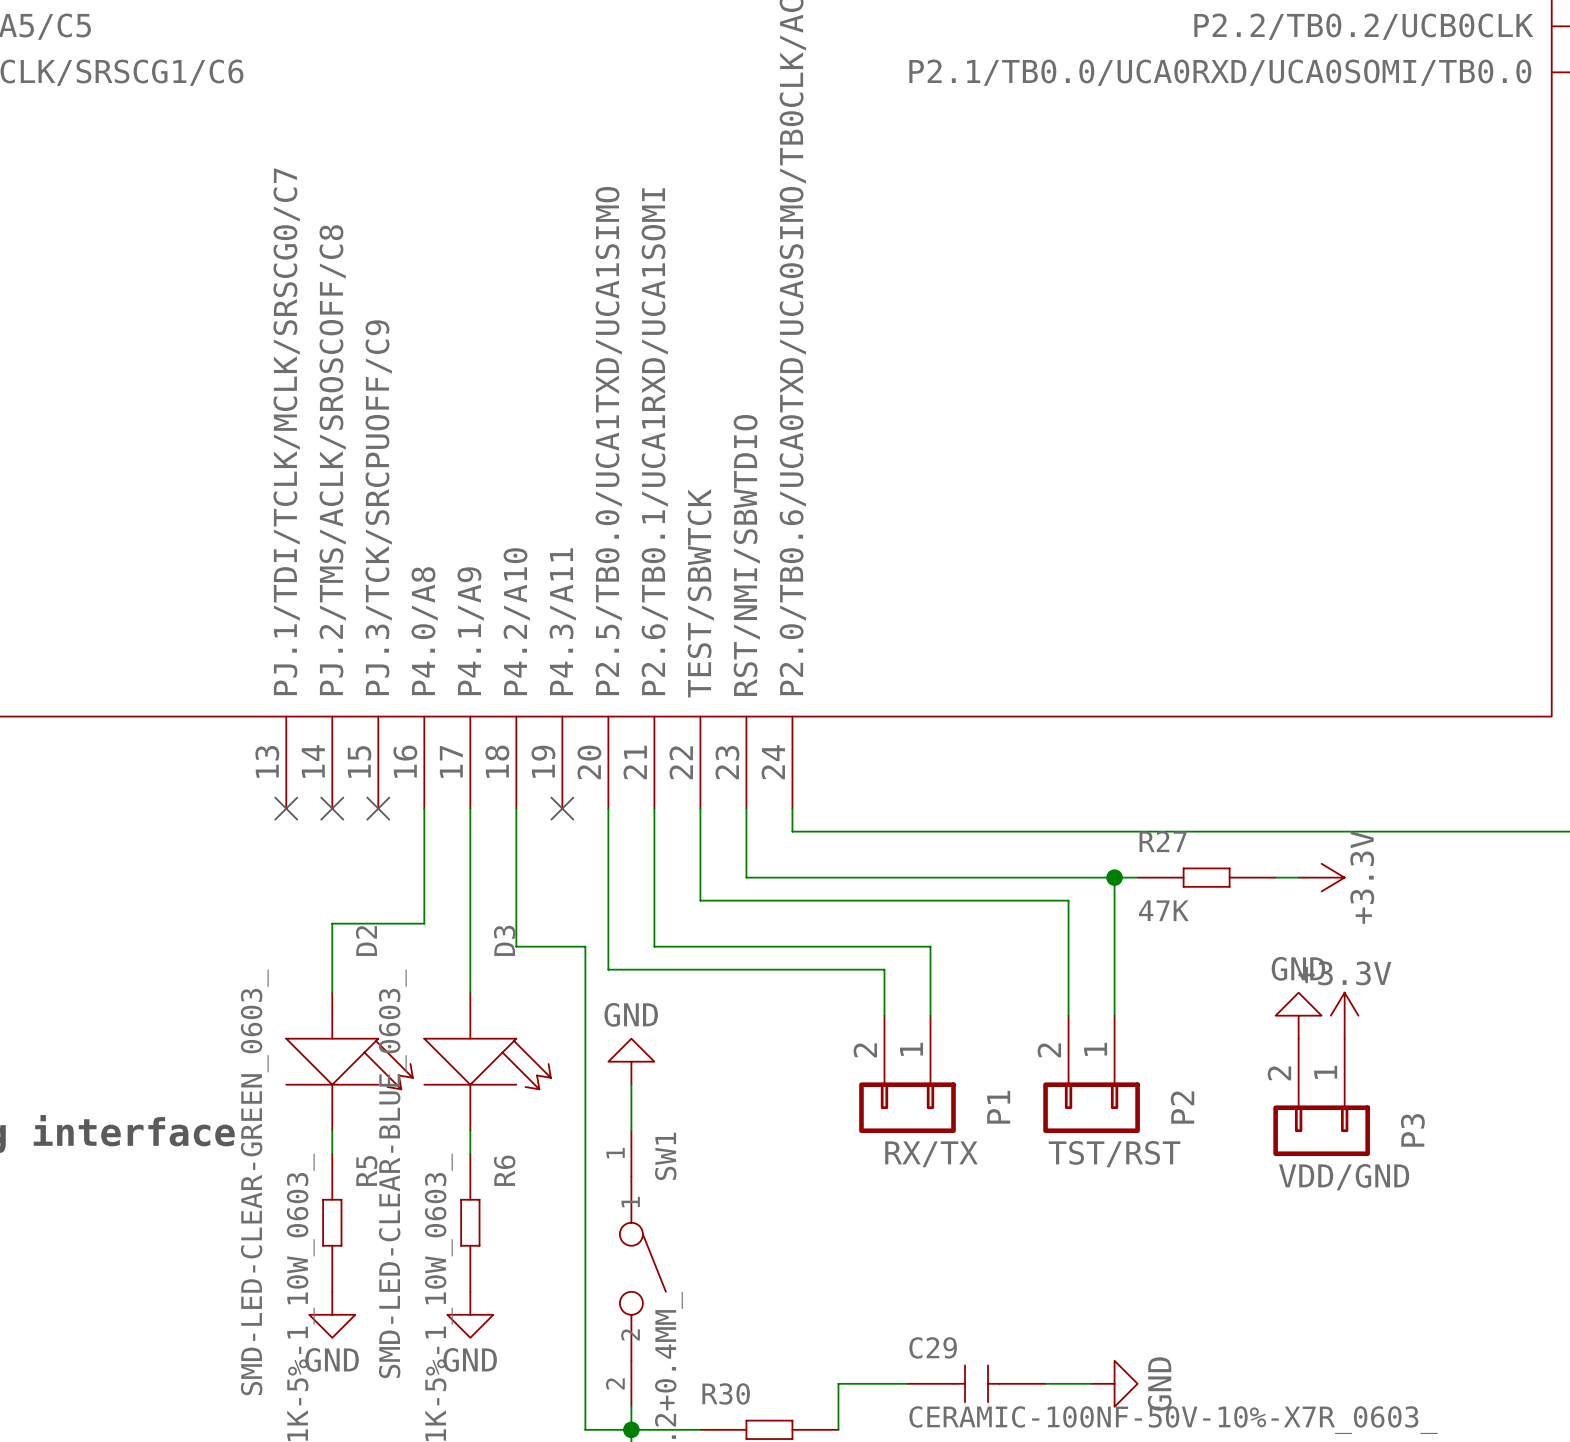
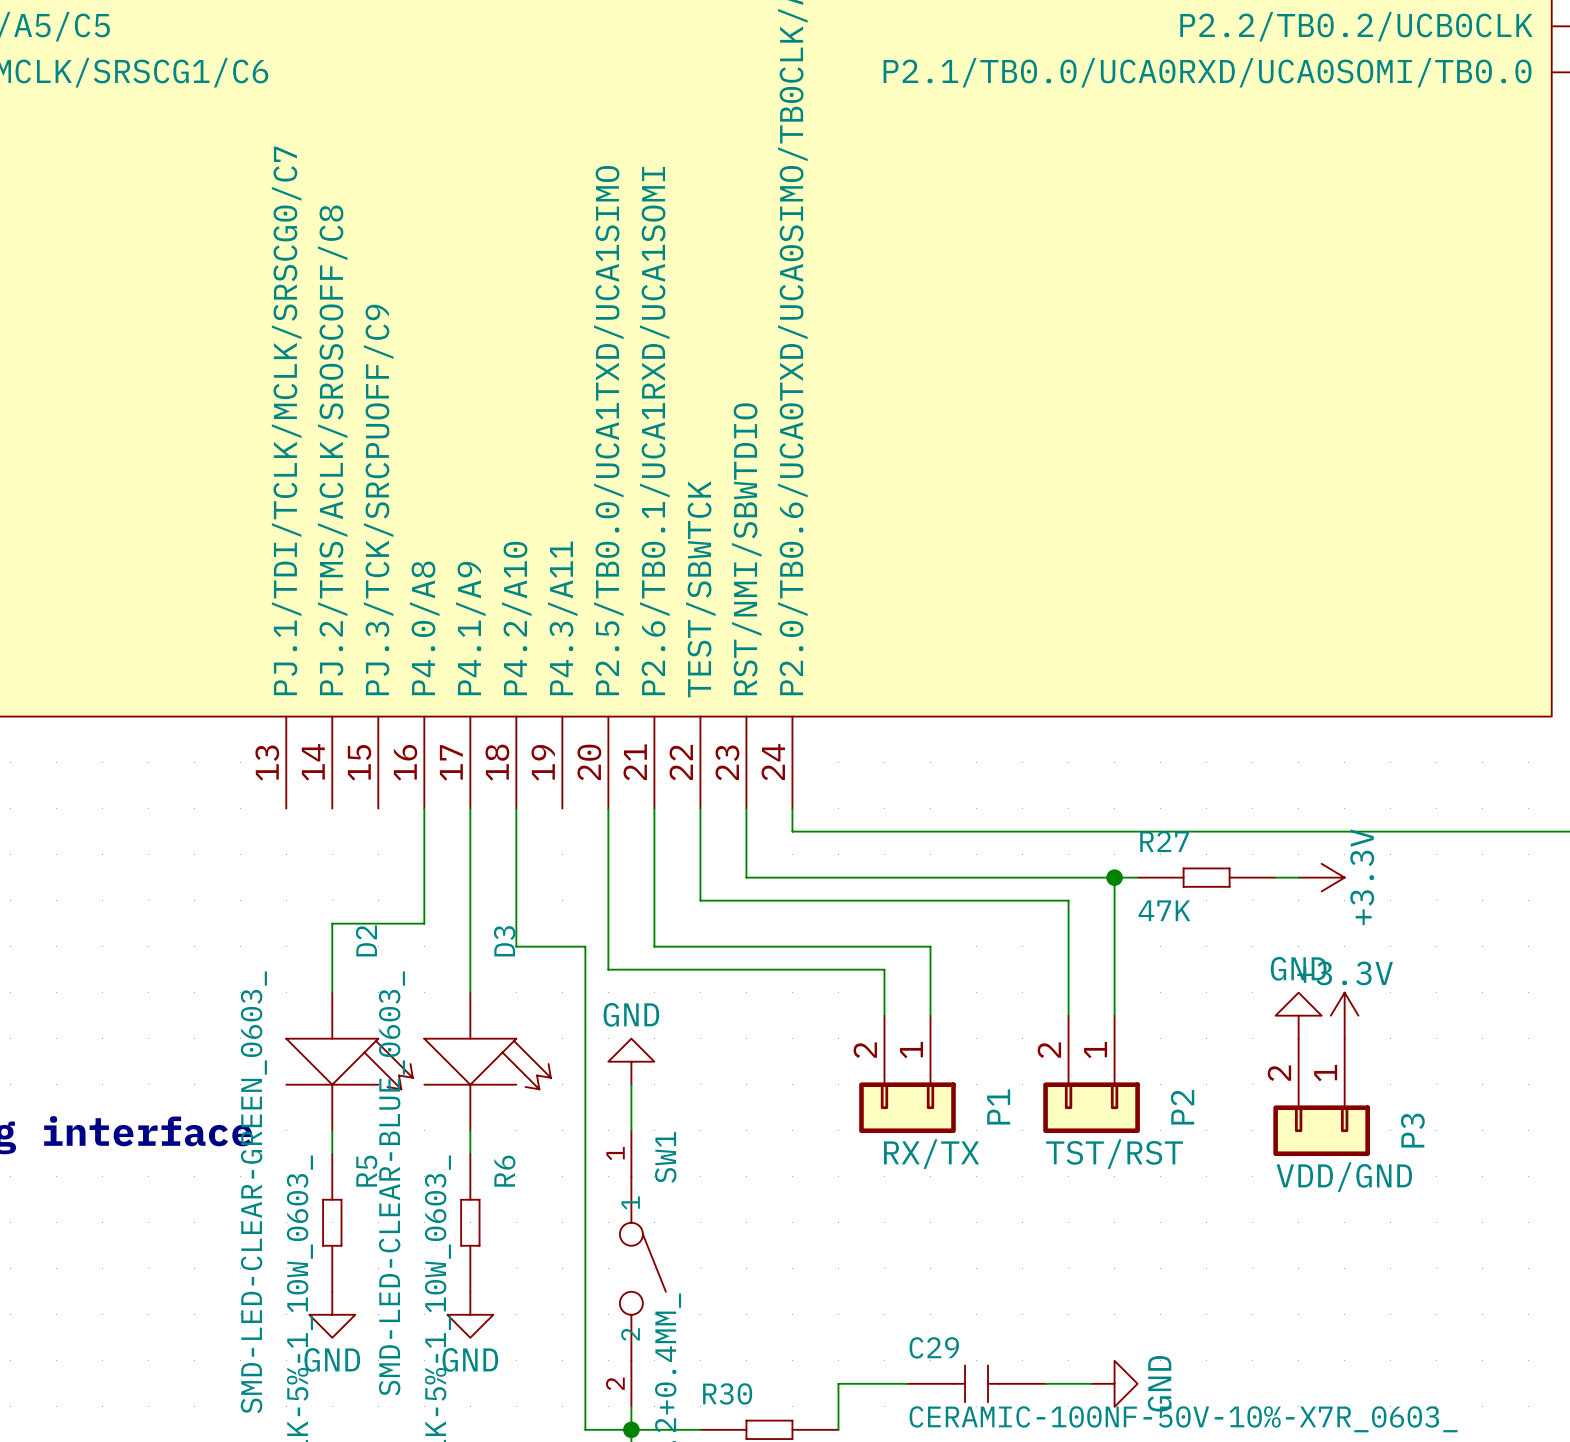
no-connect mark: (286, 808) -> none
no-connect mark: (332, 808) -> none
no-connect mark: (378, 808) -> none
no-connect mark: (562, 808) -> none

